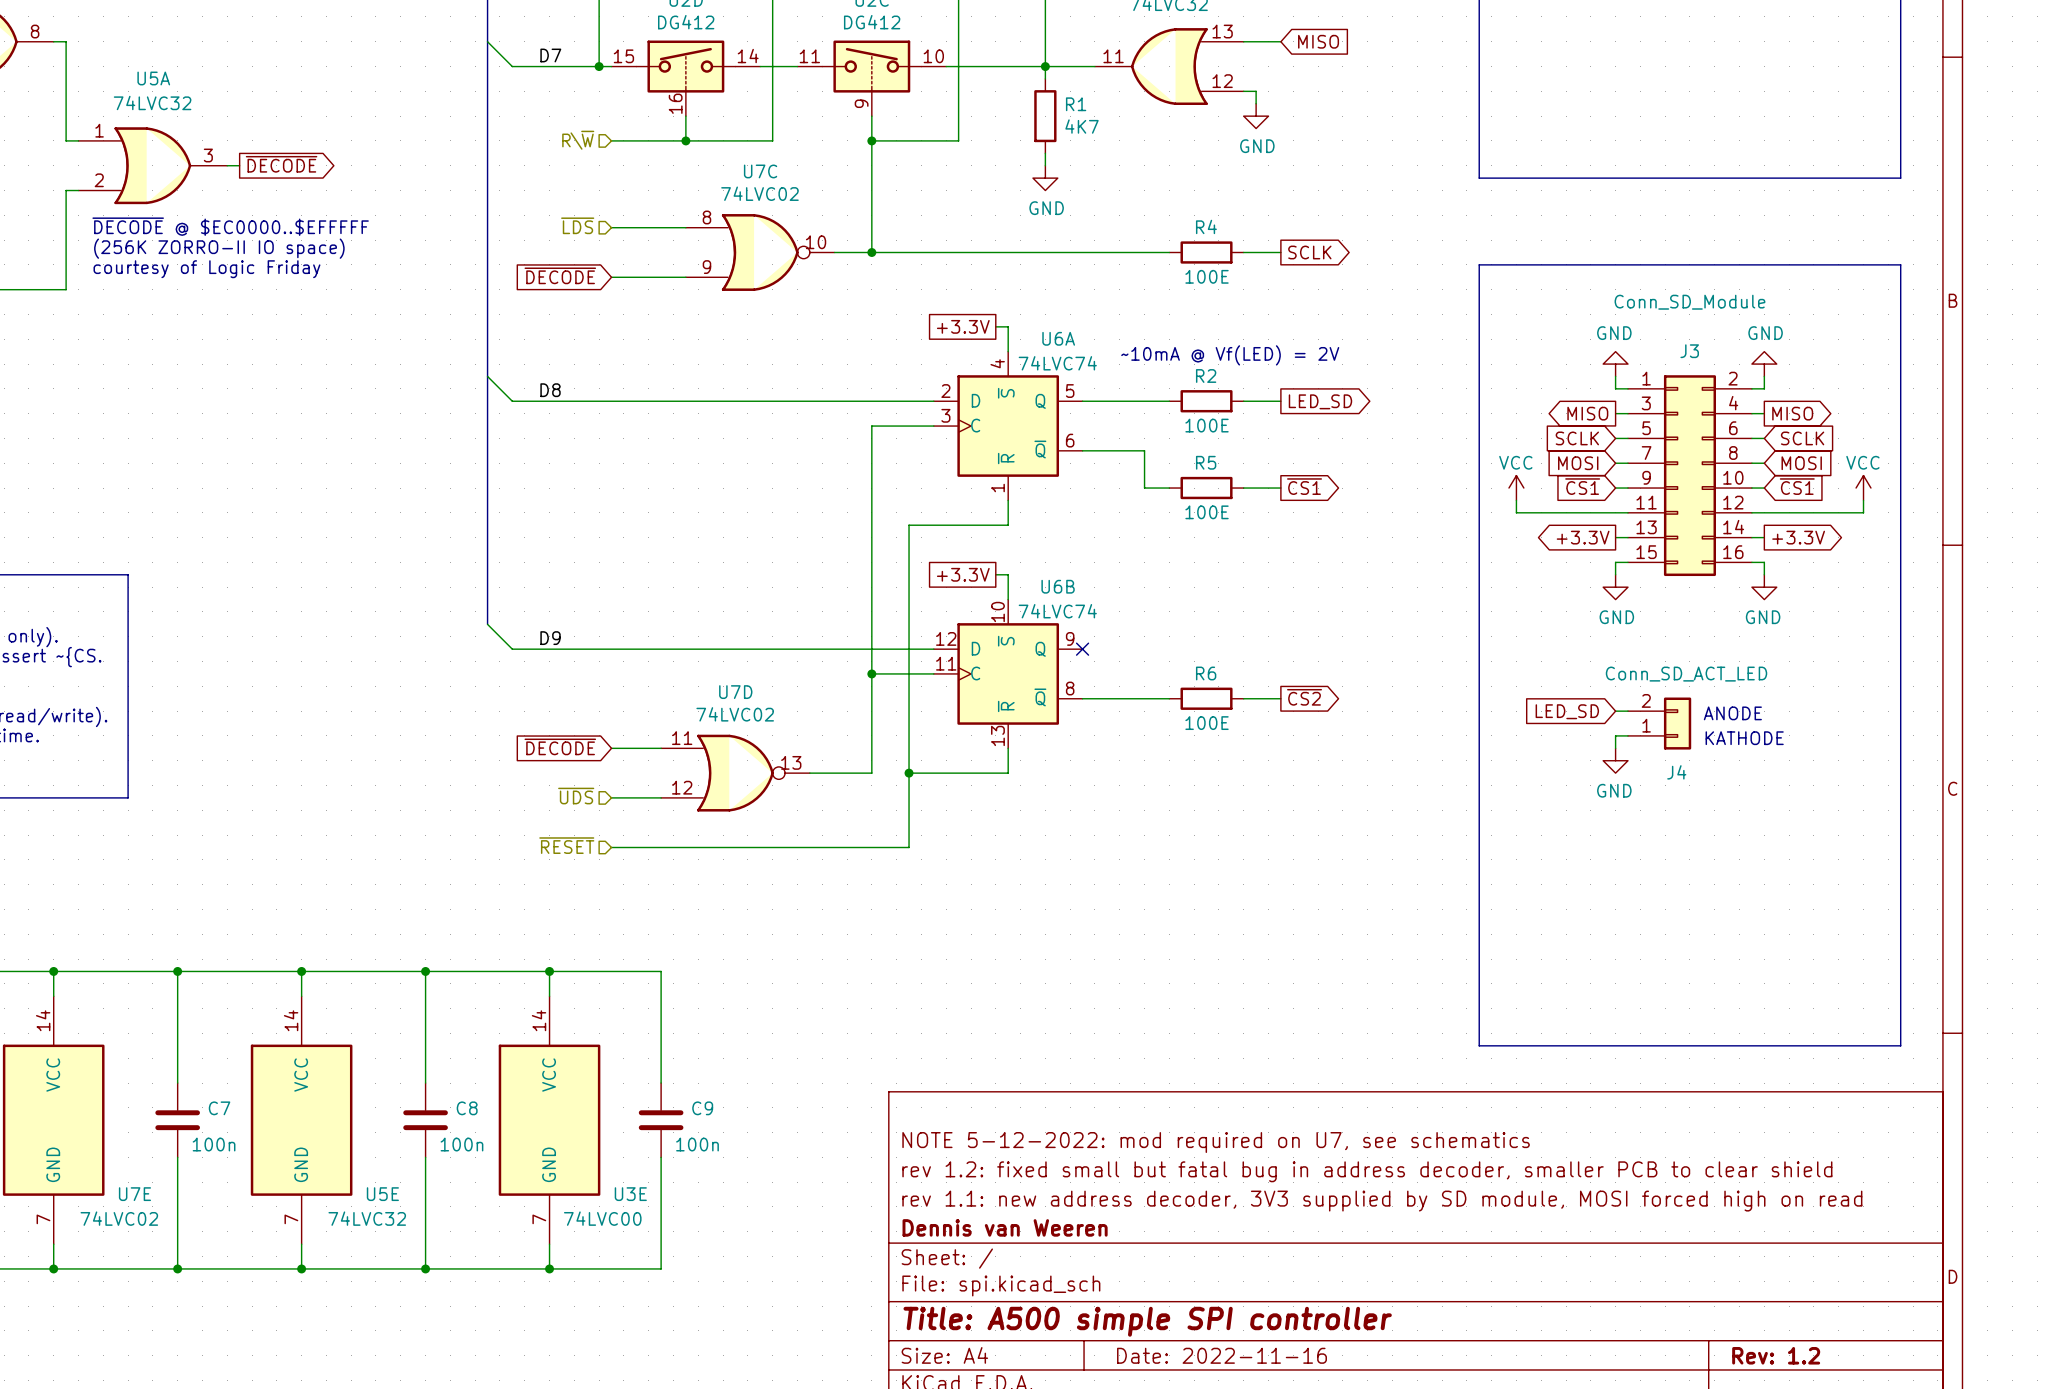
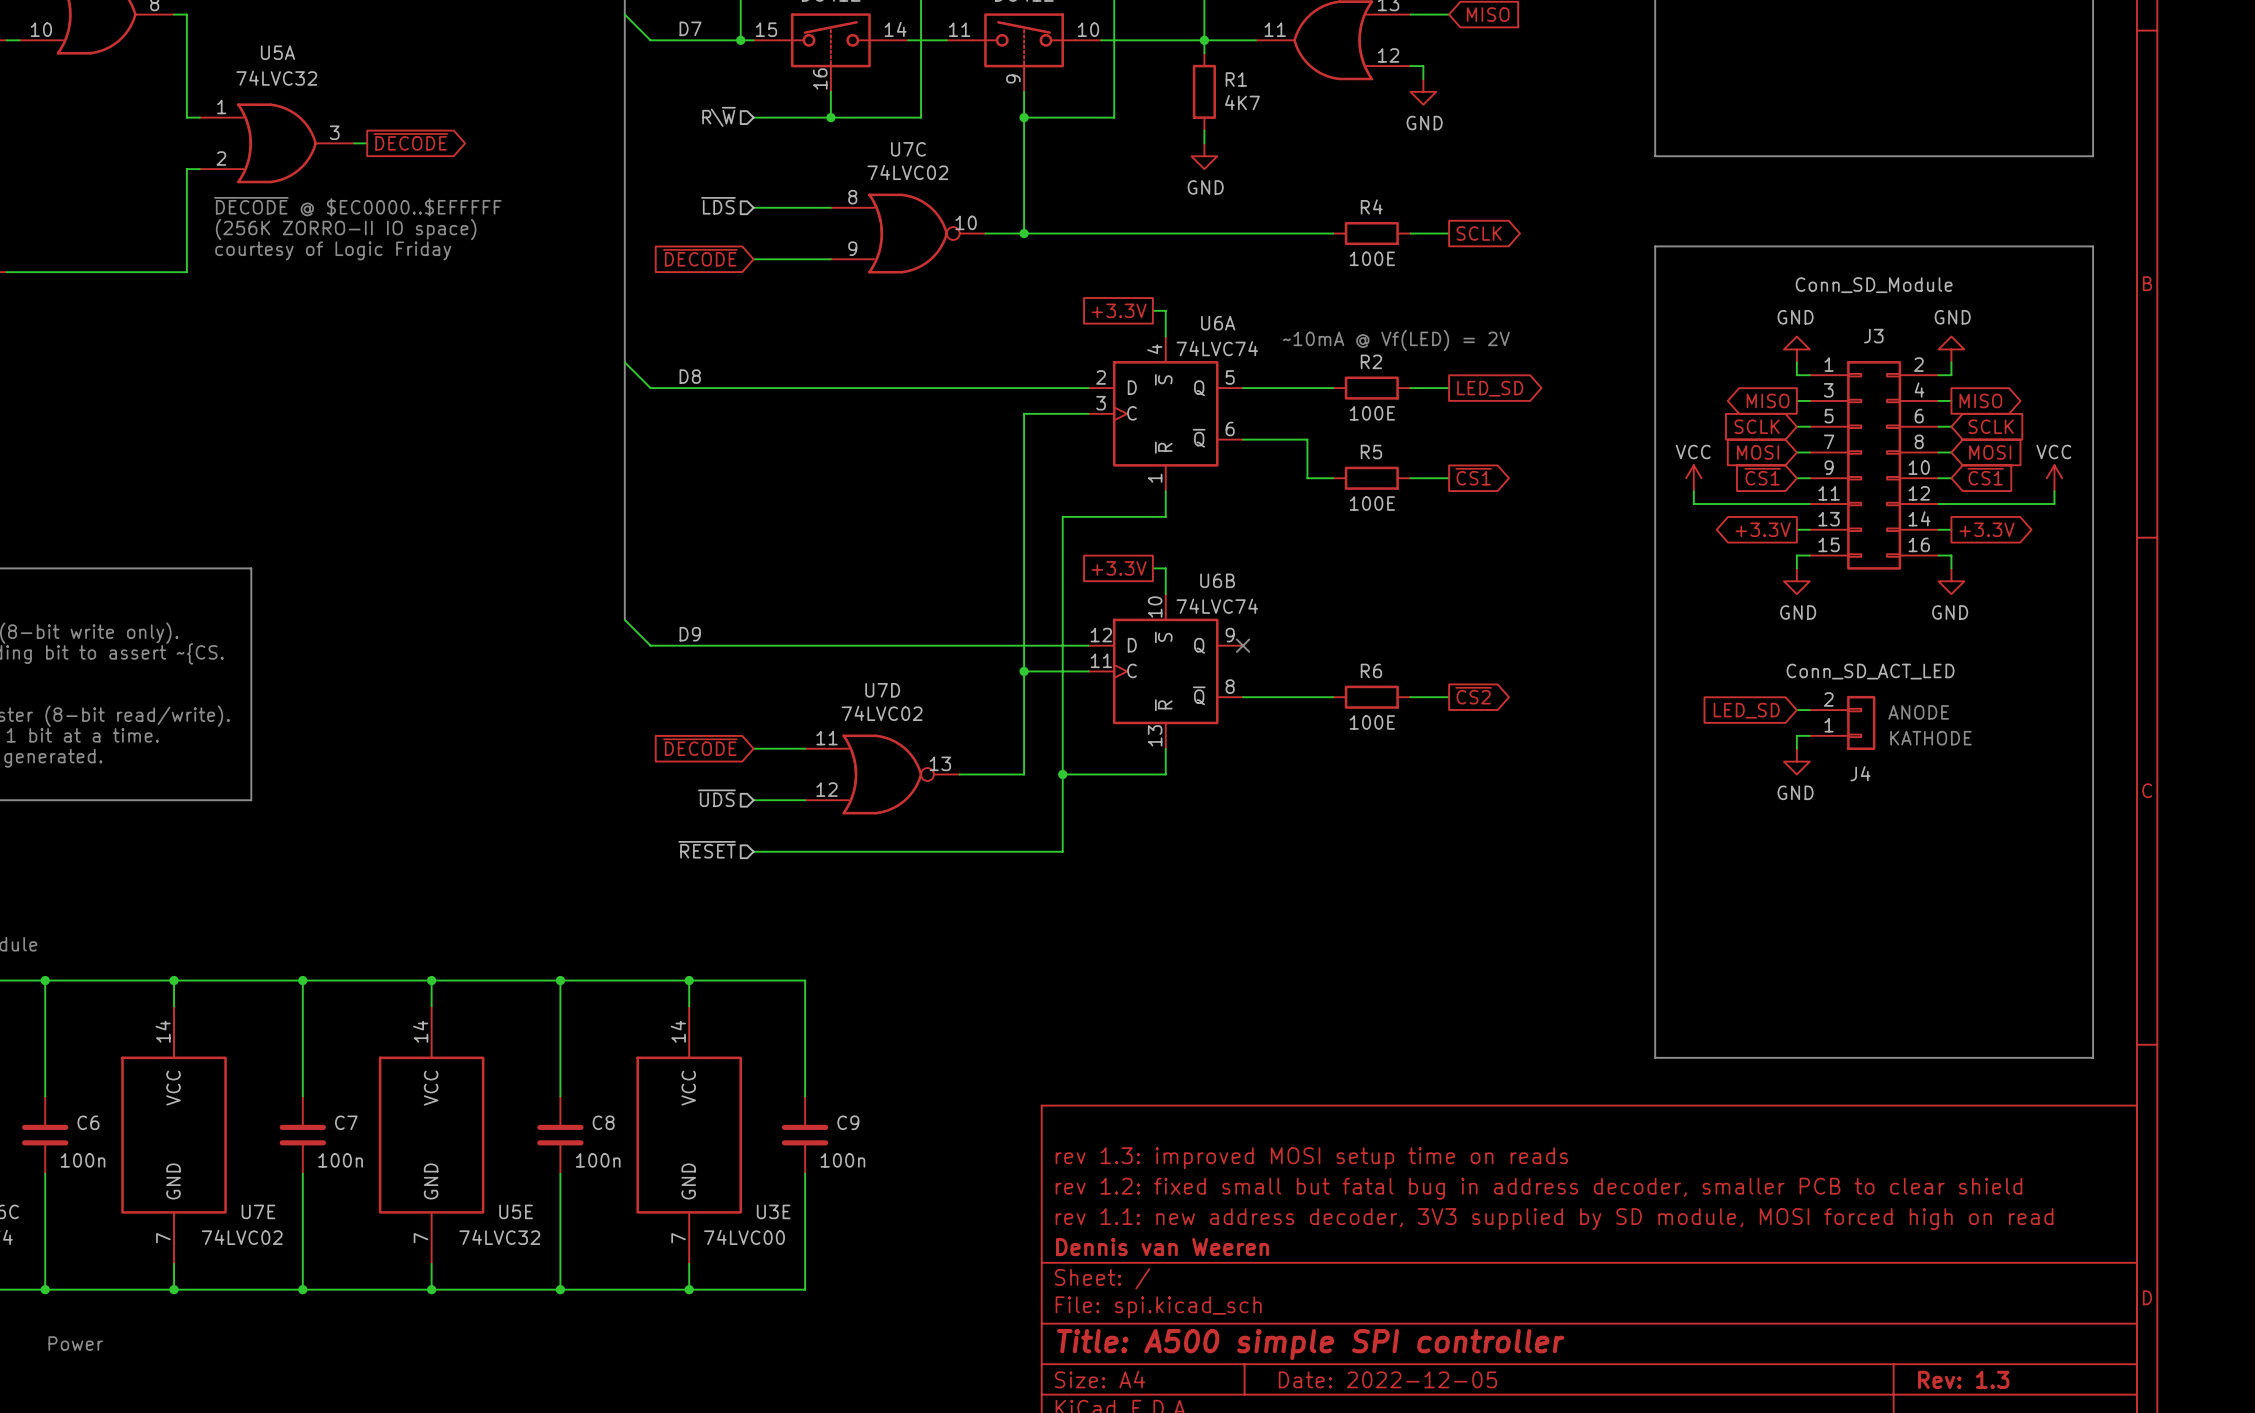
title block: NOTE 5-12-2022: mod required on U7, see schematics (1216, 1142) -> rev 1.3: improved MOSI setup time on reads (1311, 1158)
title block: Date: 2022-11-16 (1222, 1355) -> Date: 2022-12-05 (1387, 1379)
title block: Rev: 1.2 (1776, 1355) -> Rev: 1.3 (1963, 1379)

